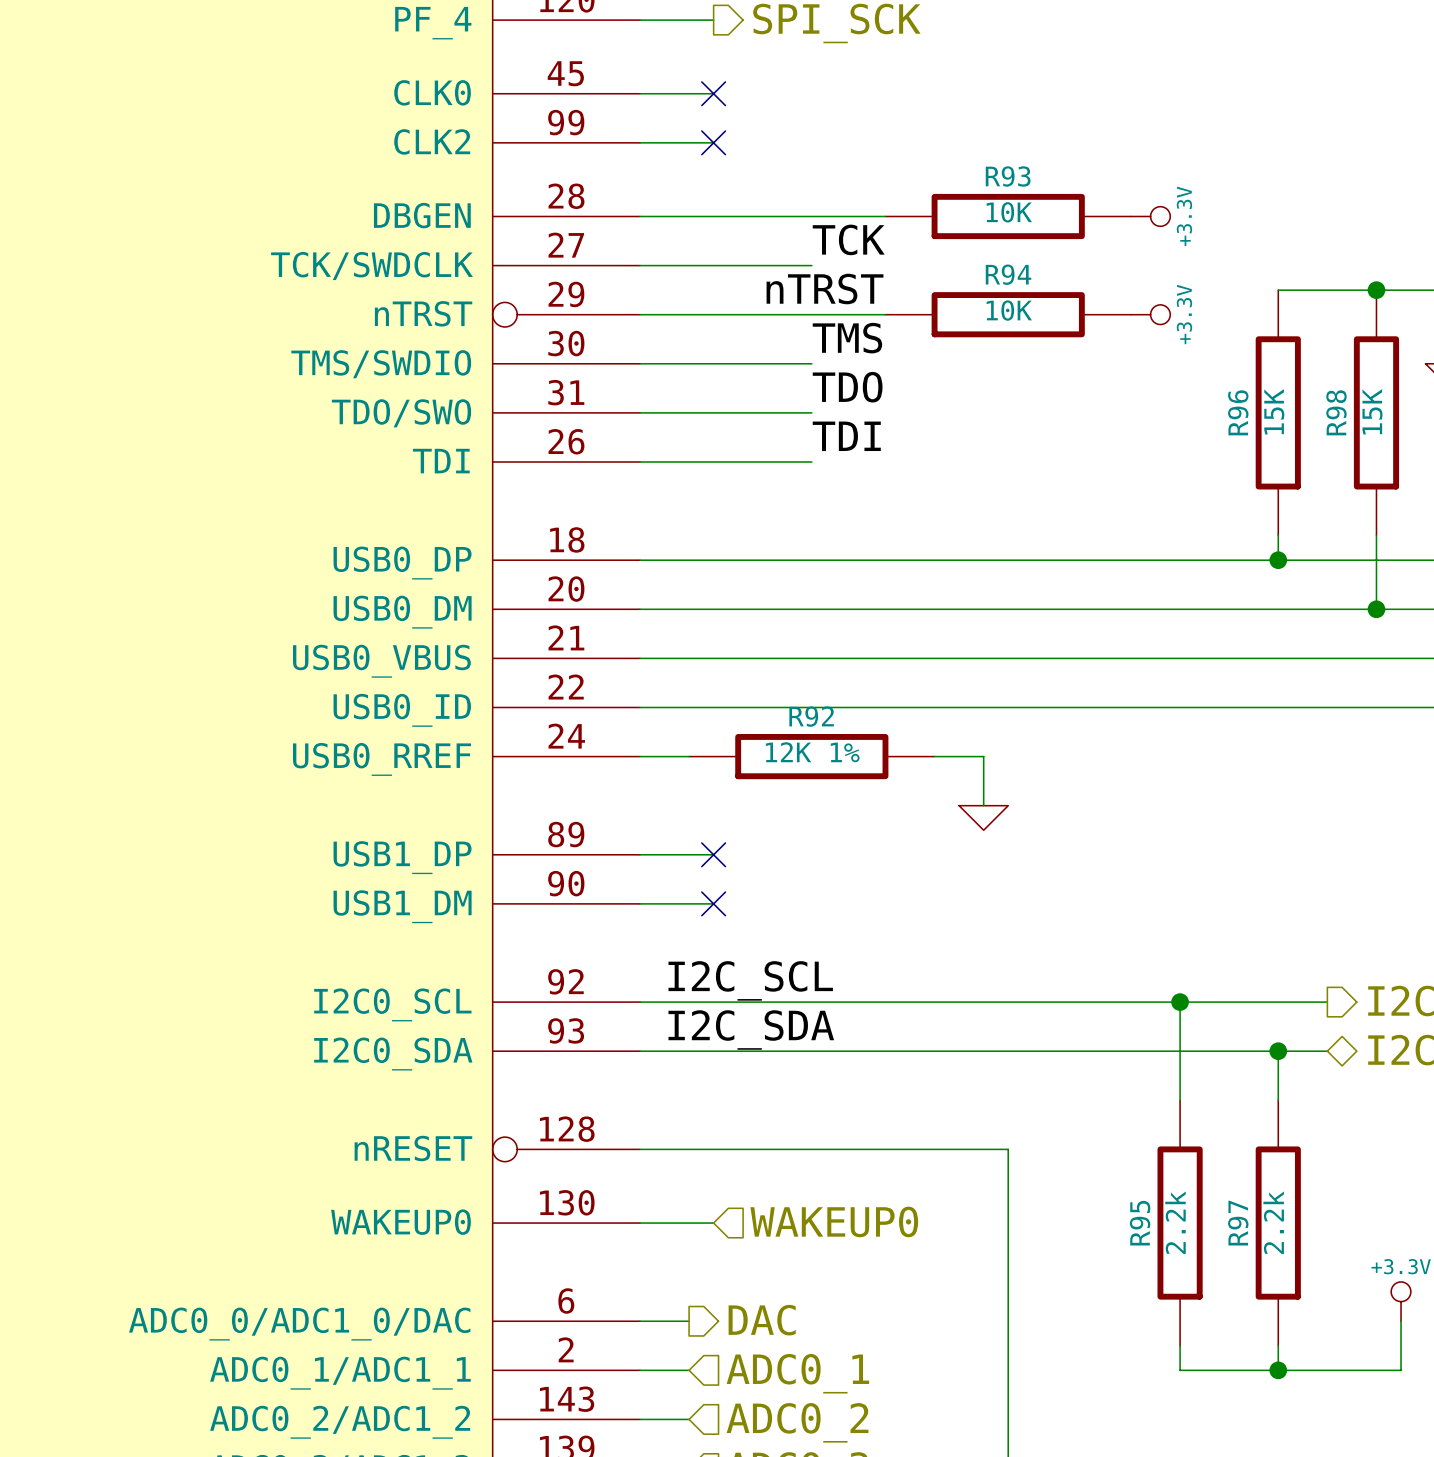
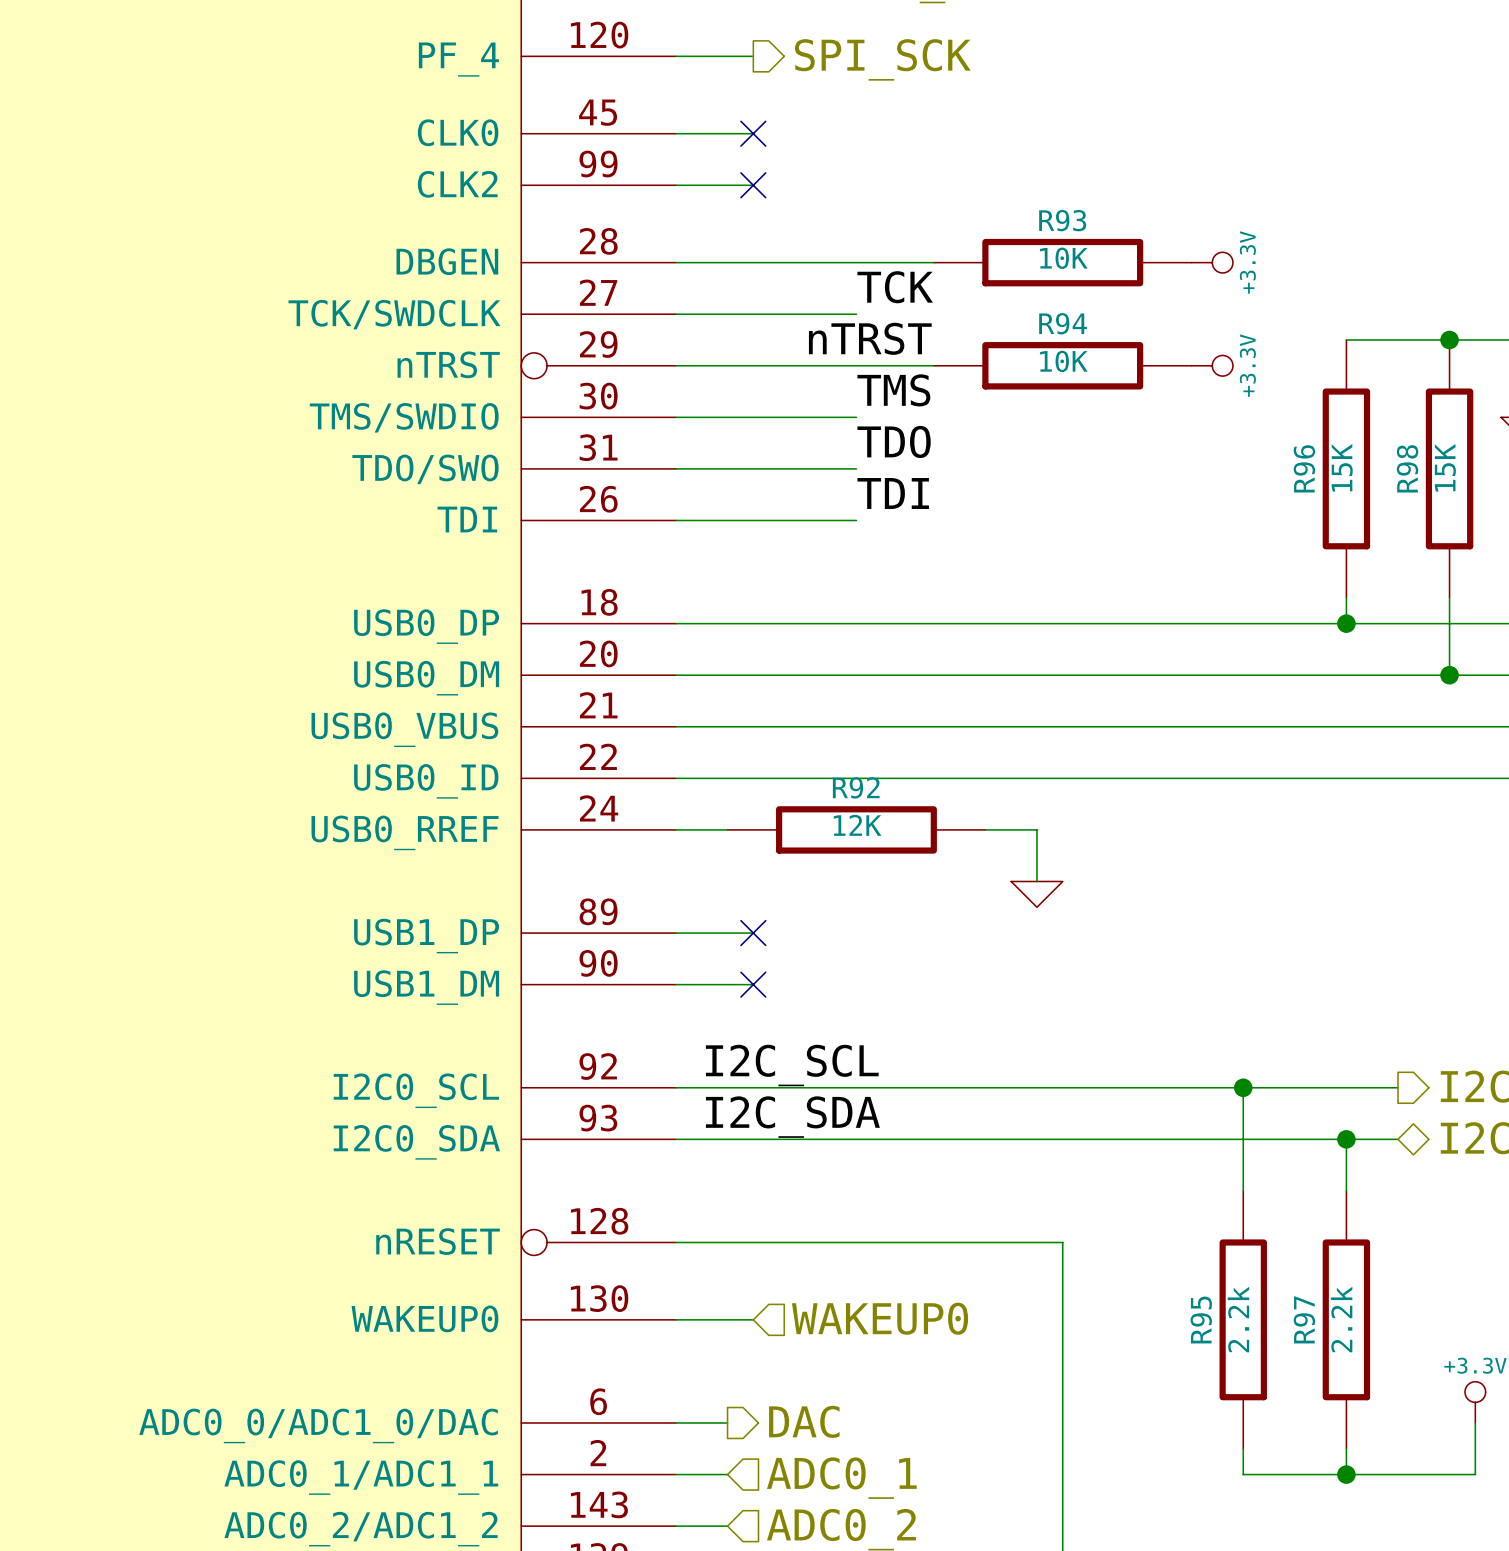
R92 value: 12K 1% (812, 752) -> 12K (857, 825)

